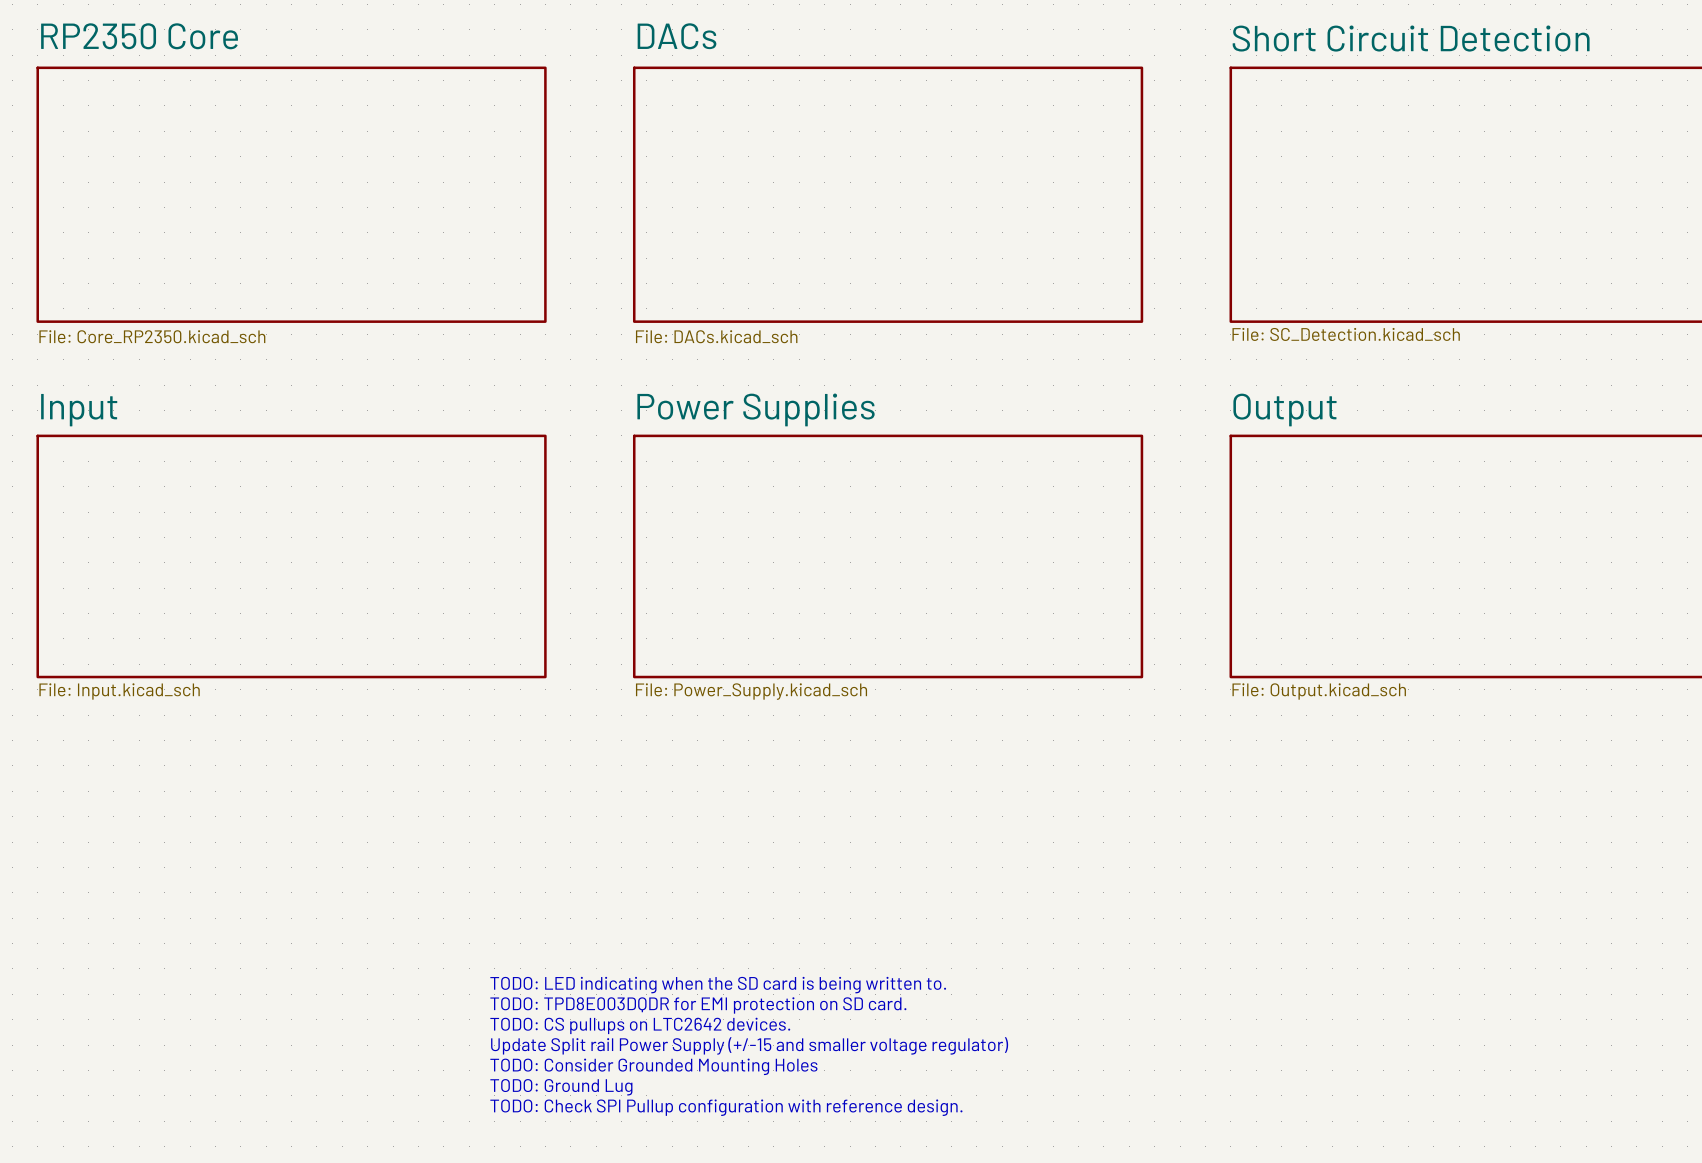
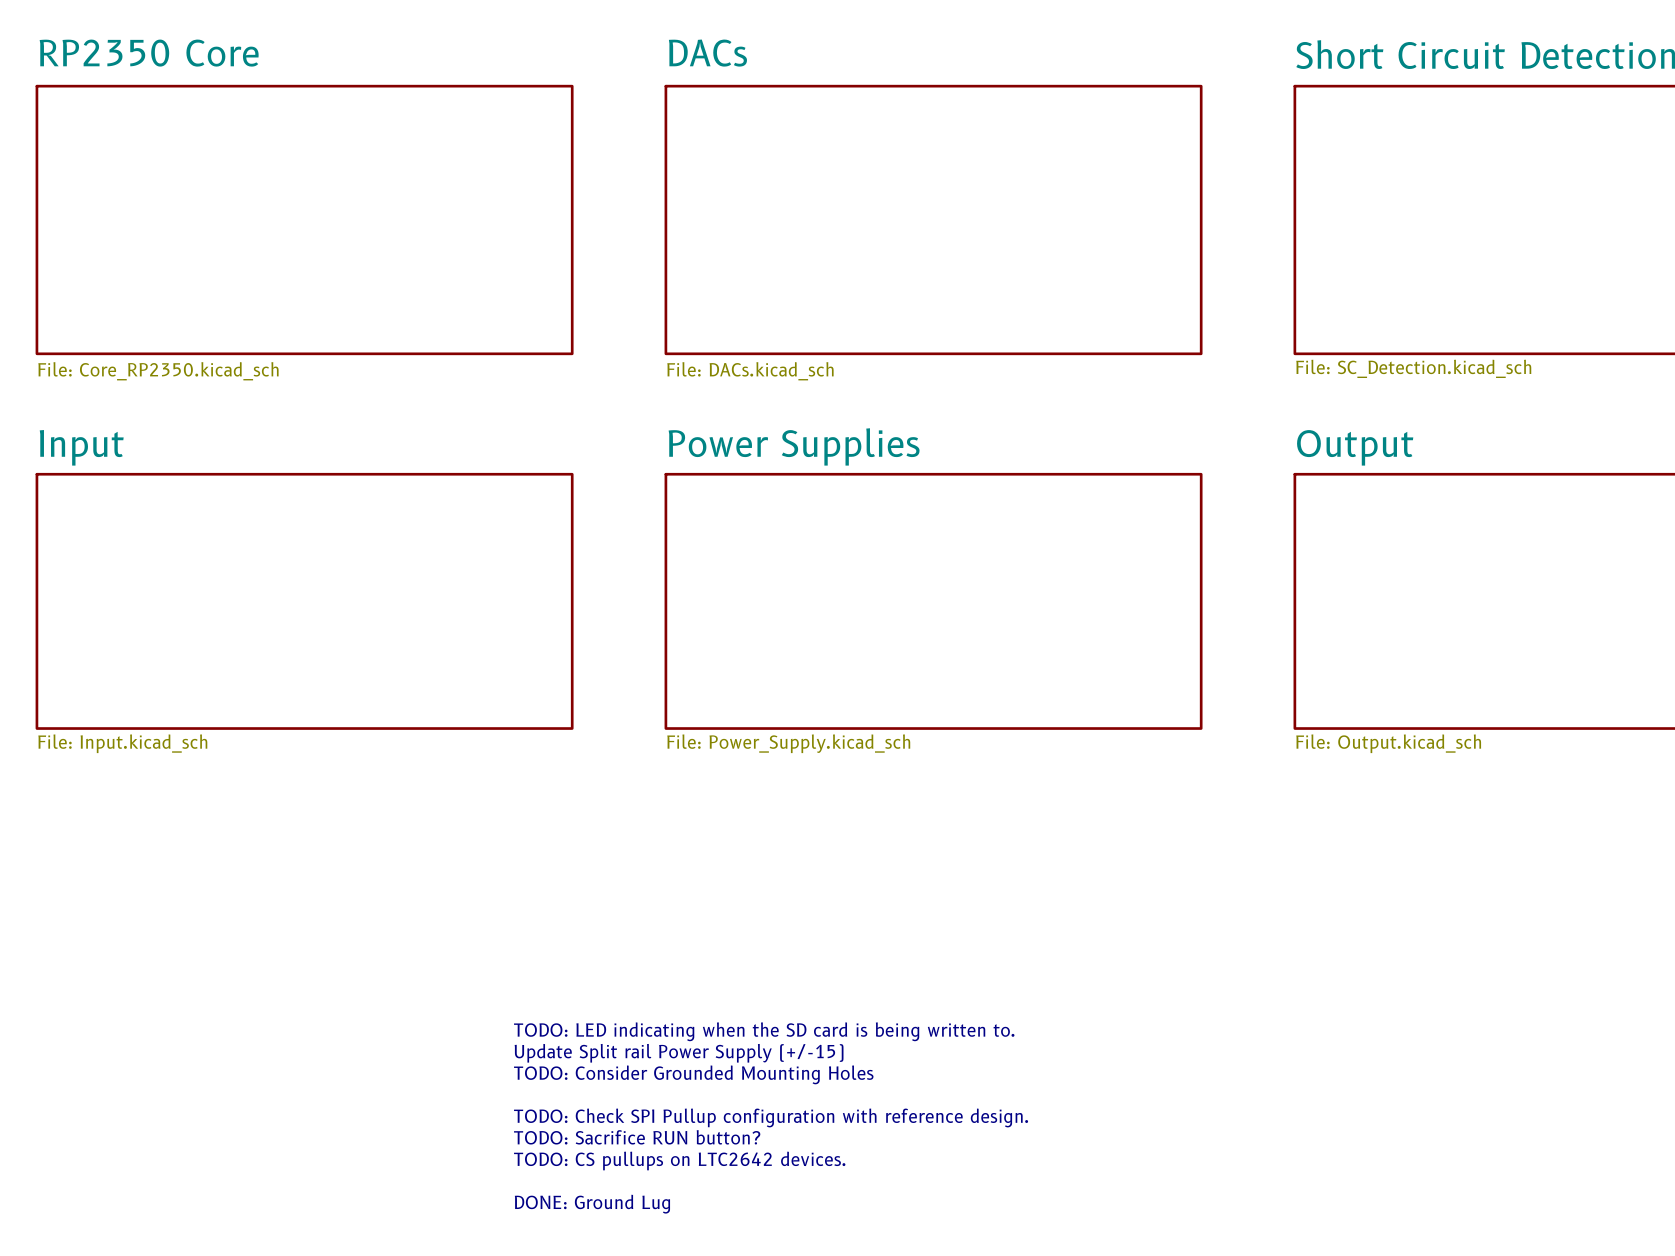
text: none -> TODO: LED indicating when the SD card is being written to. (764, 1031)
text: TODO: LED indicating when the SD card is being written to. (718, 985) -> Update Split rail Power Supply (+/-15) (679, 1053)
text: TODO: TPD8E003DQDR for EMI protection on SD card. (698, 1005) -> TODO: Consider Grounded Mounting Holes (693, 1074)
text: TODO: CS pullups on LTC2642 devices. (640, 1025) -> none
text: Update Split rail Power Supply (+/-15 and smaller voltage regulator) (749, 1045) -> TODO: Check SPI Pullup configuration with reference design. (771, 1117)
text: TODO: Consider Grounded Mounting Holes (653, 1066) -> TODO: Sacrifice RUN button? (637, 1137)
text: TODO: Ground Lug (561, 1087) -> TODO: CS pullups on LTC2642 devices. (679, 1160)
text: TODO: Check SPI Pullup configuration with reference design. (726, 1107) -> none
text: none -> DONE: Ground Lug (592, 1204)

